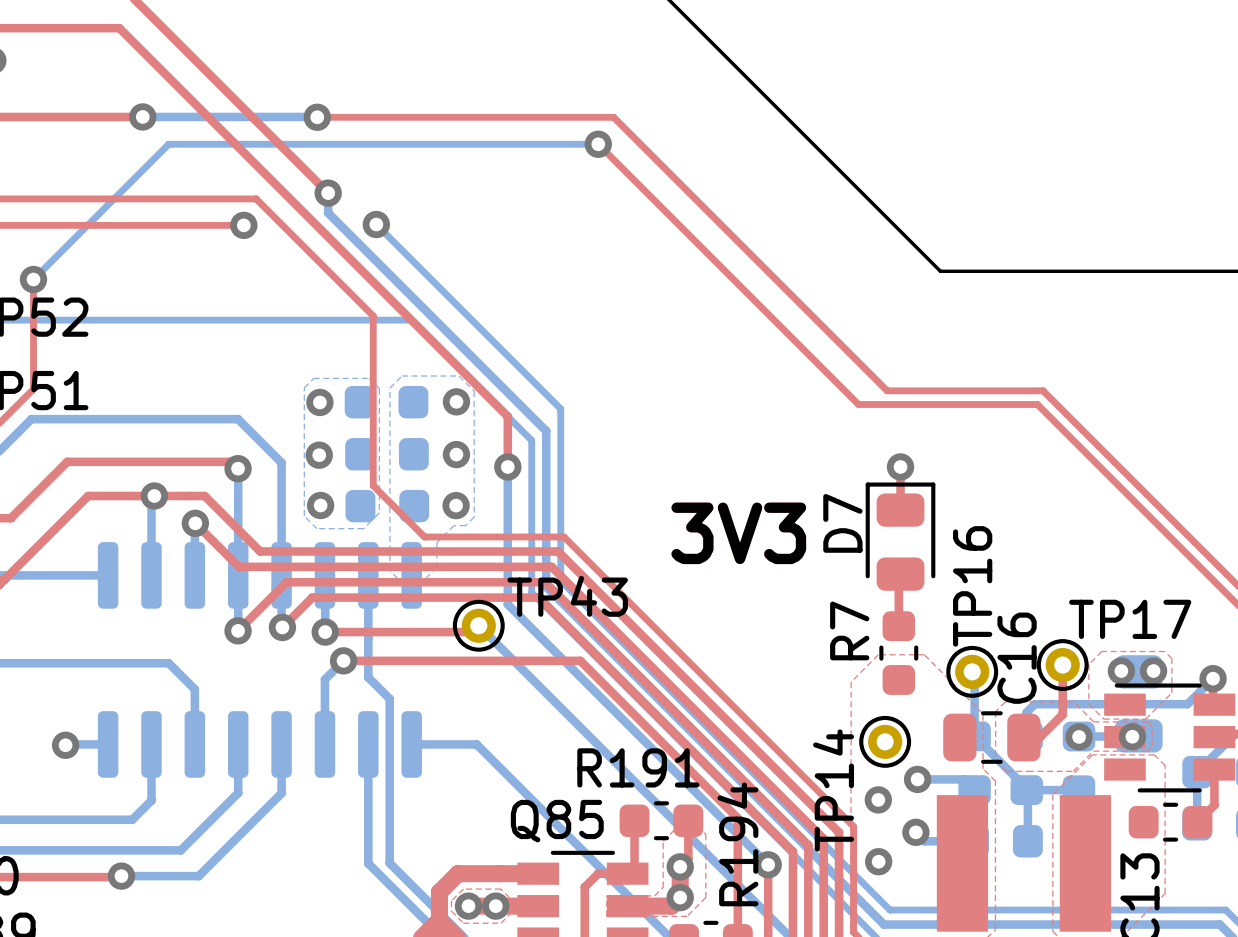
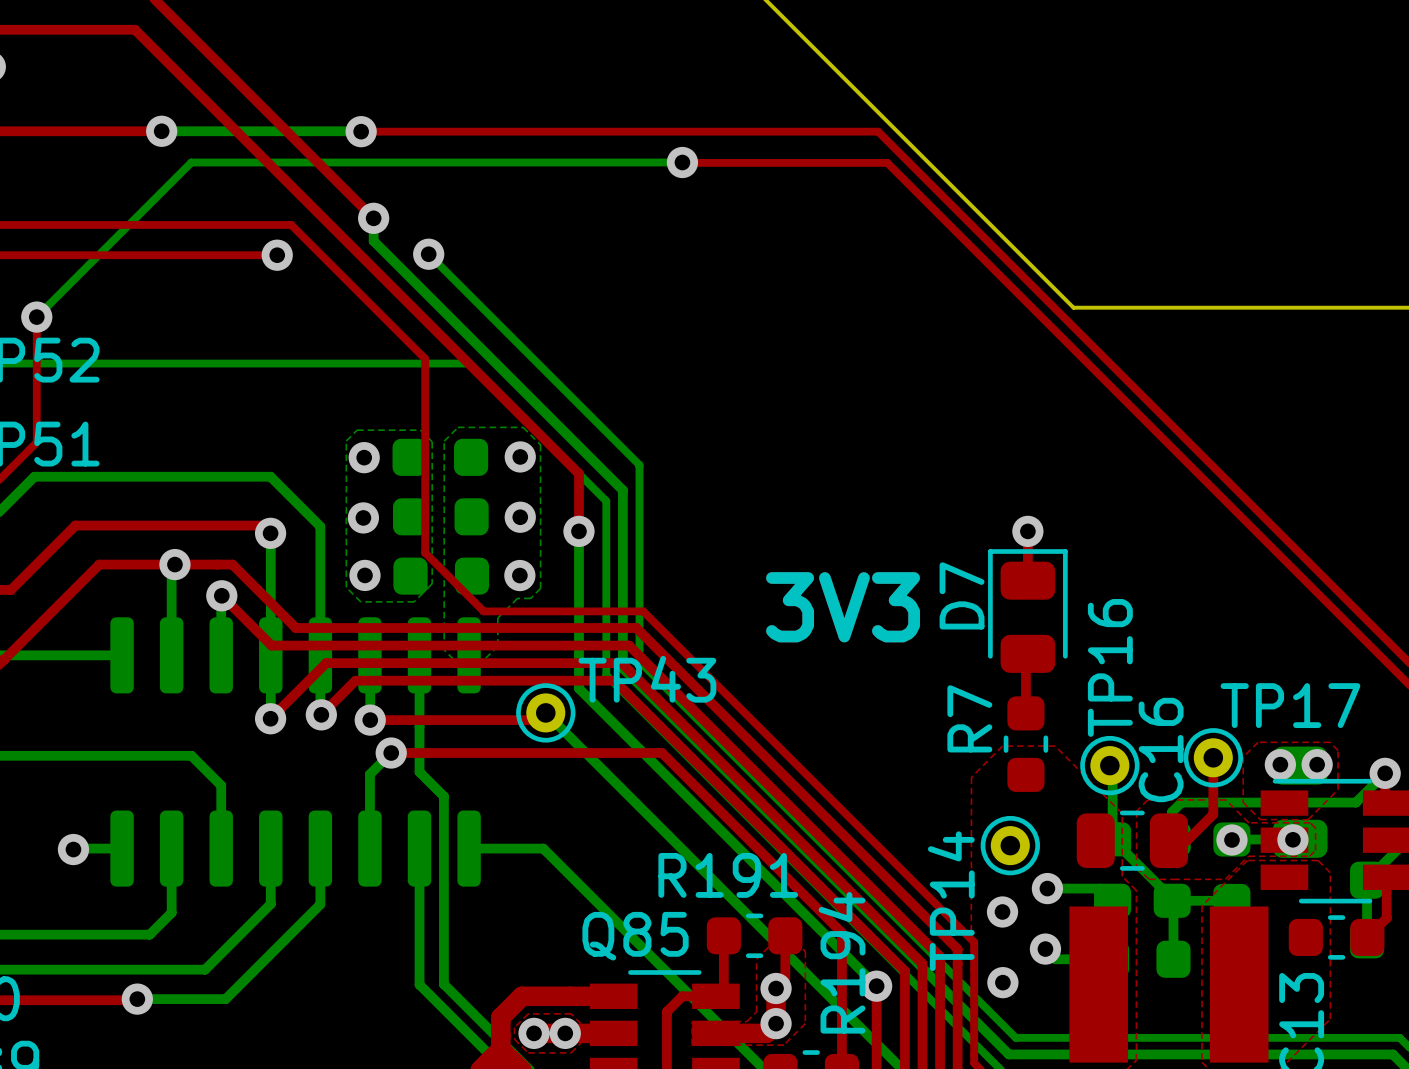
top track: (613, 117) (887, 390) (1043, 390) -> (699, 131) (878, 131) (1190, 444)
top track: (598, 144) (858, 404) (1037, 404) -> (682, 162) (887, 162) (1184, 459)

